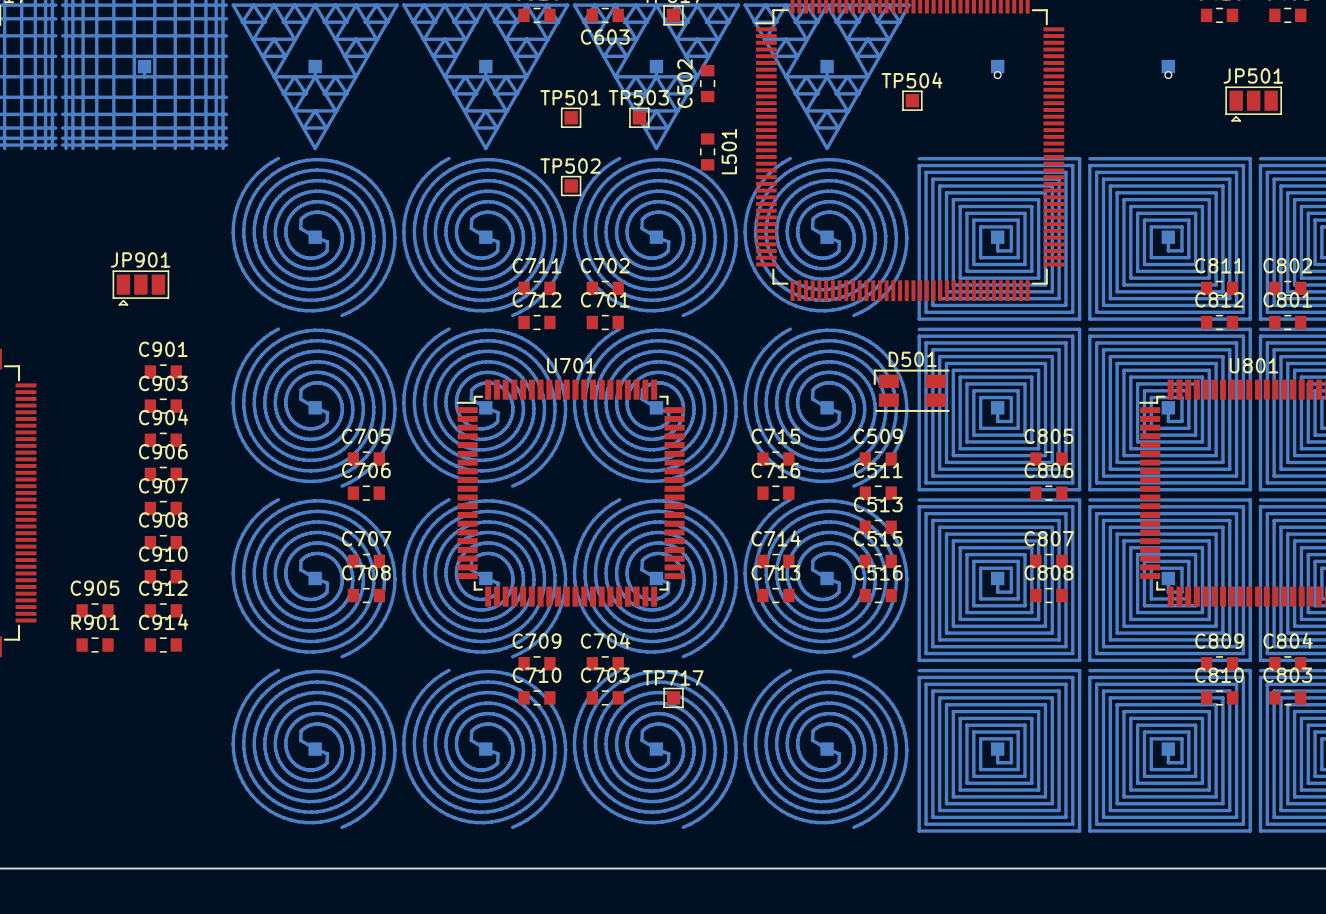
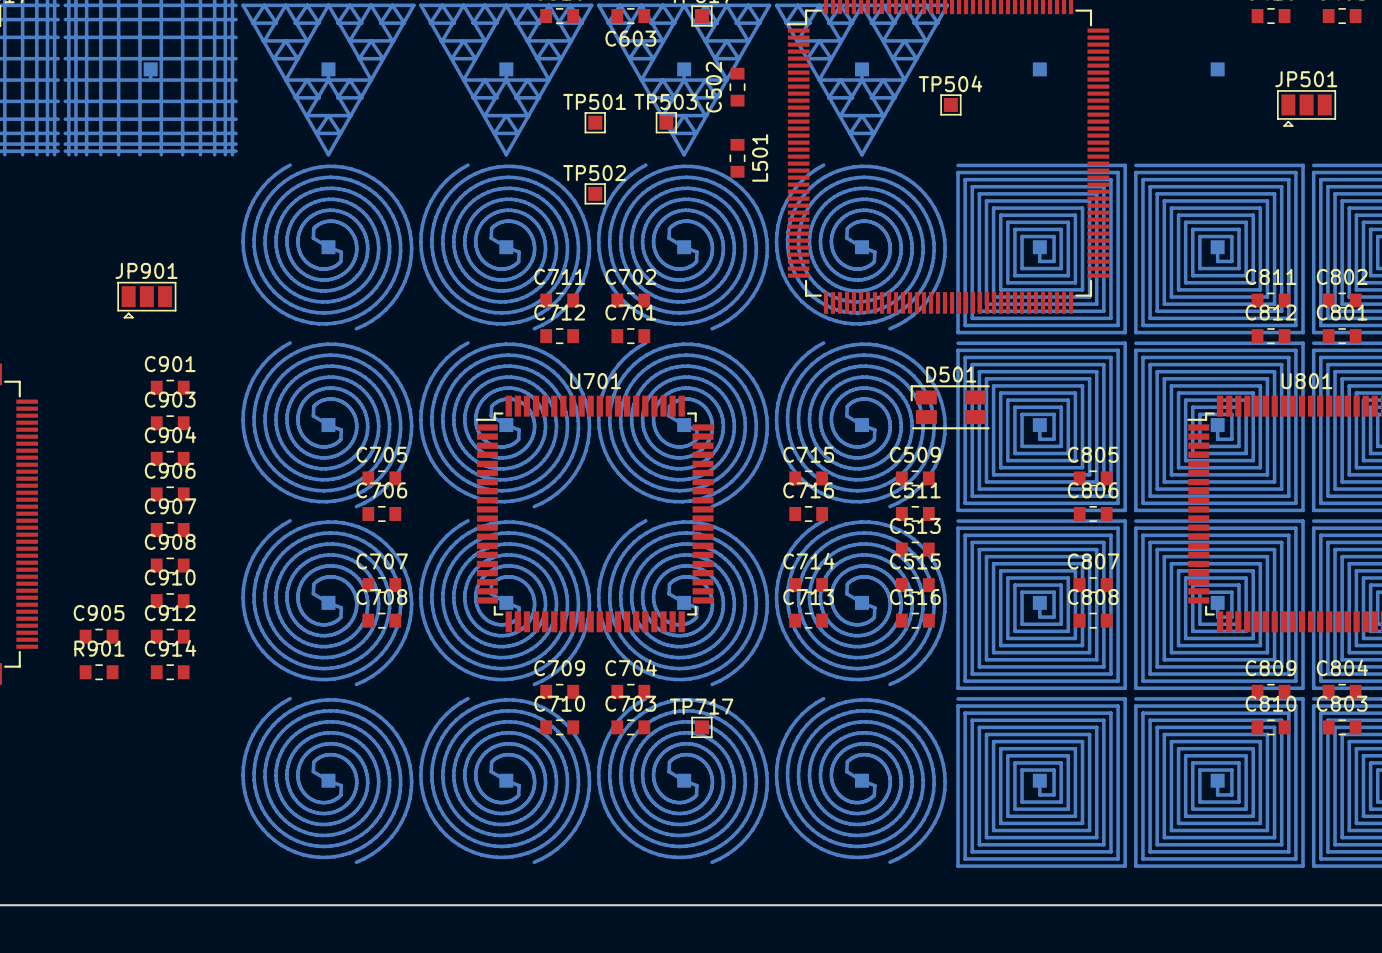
via: (997, 75) -> none
via: (1168, 75) -> none

